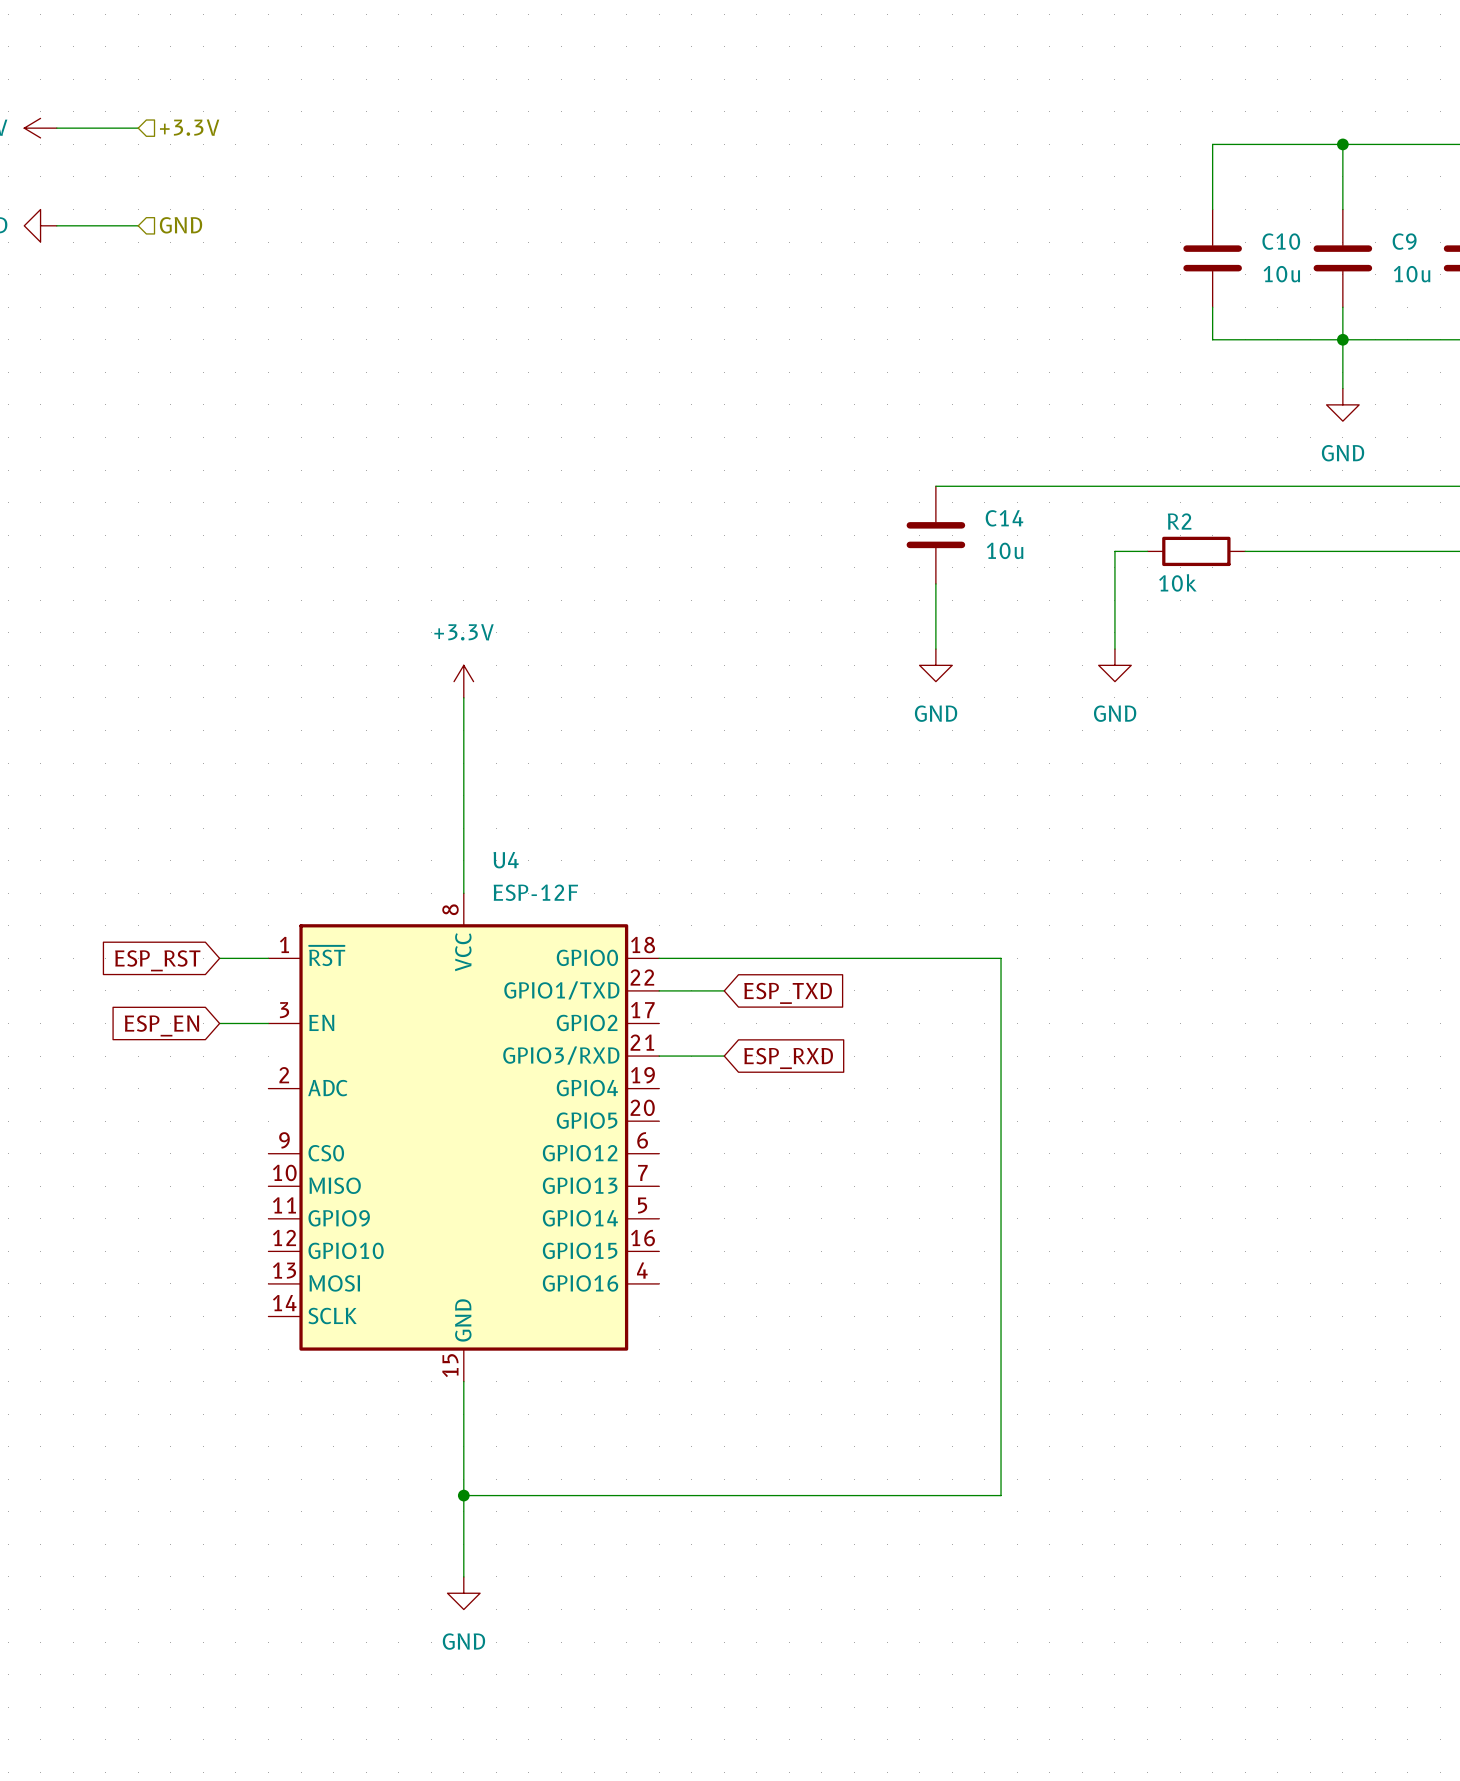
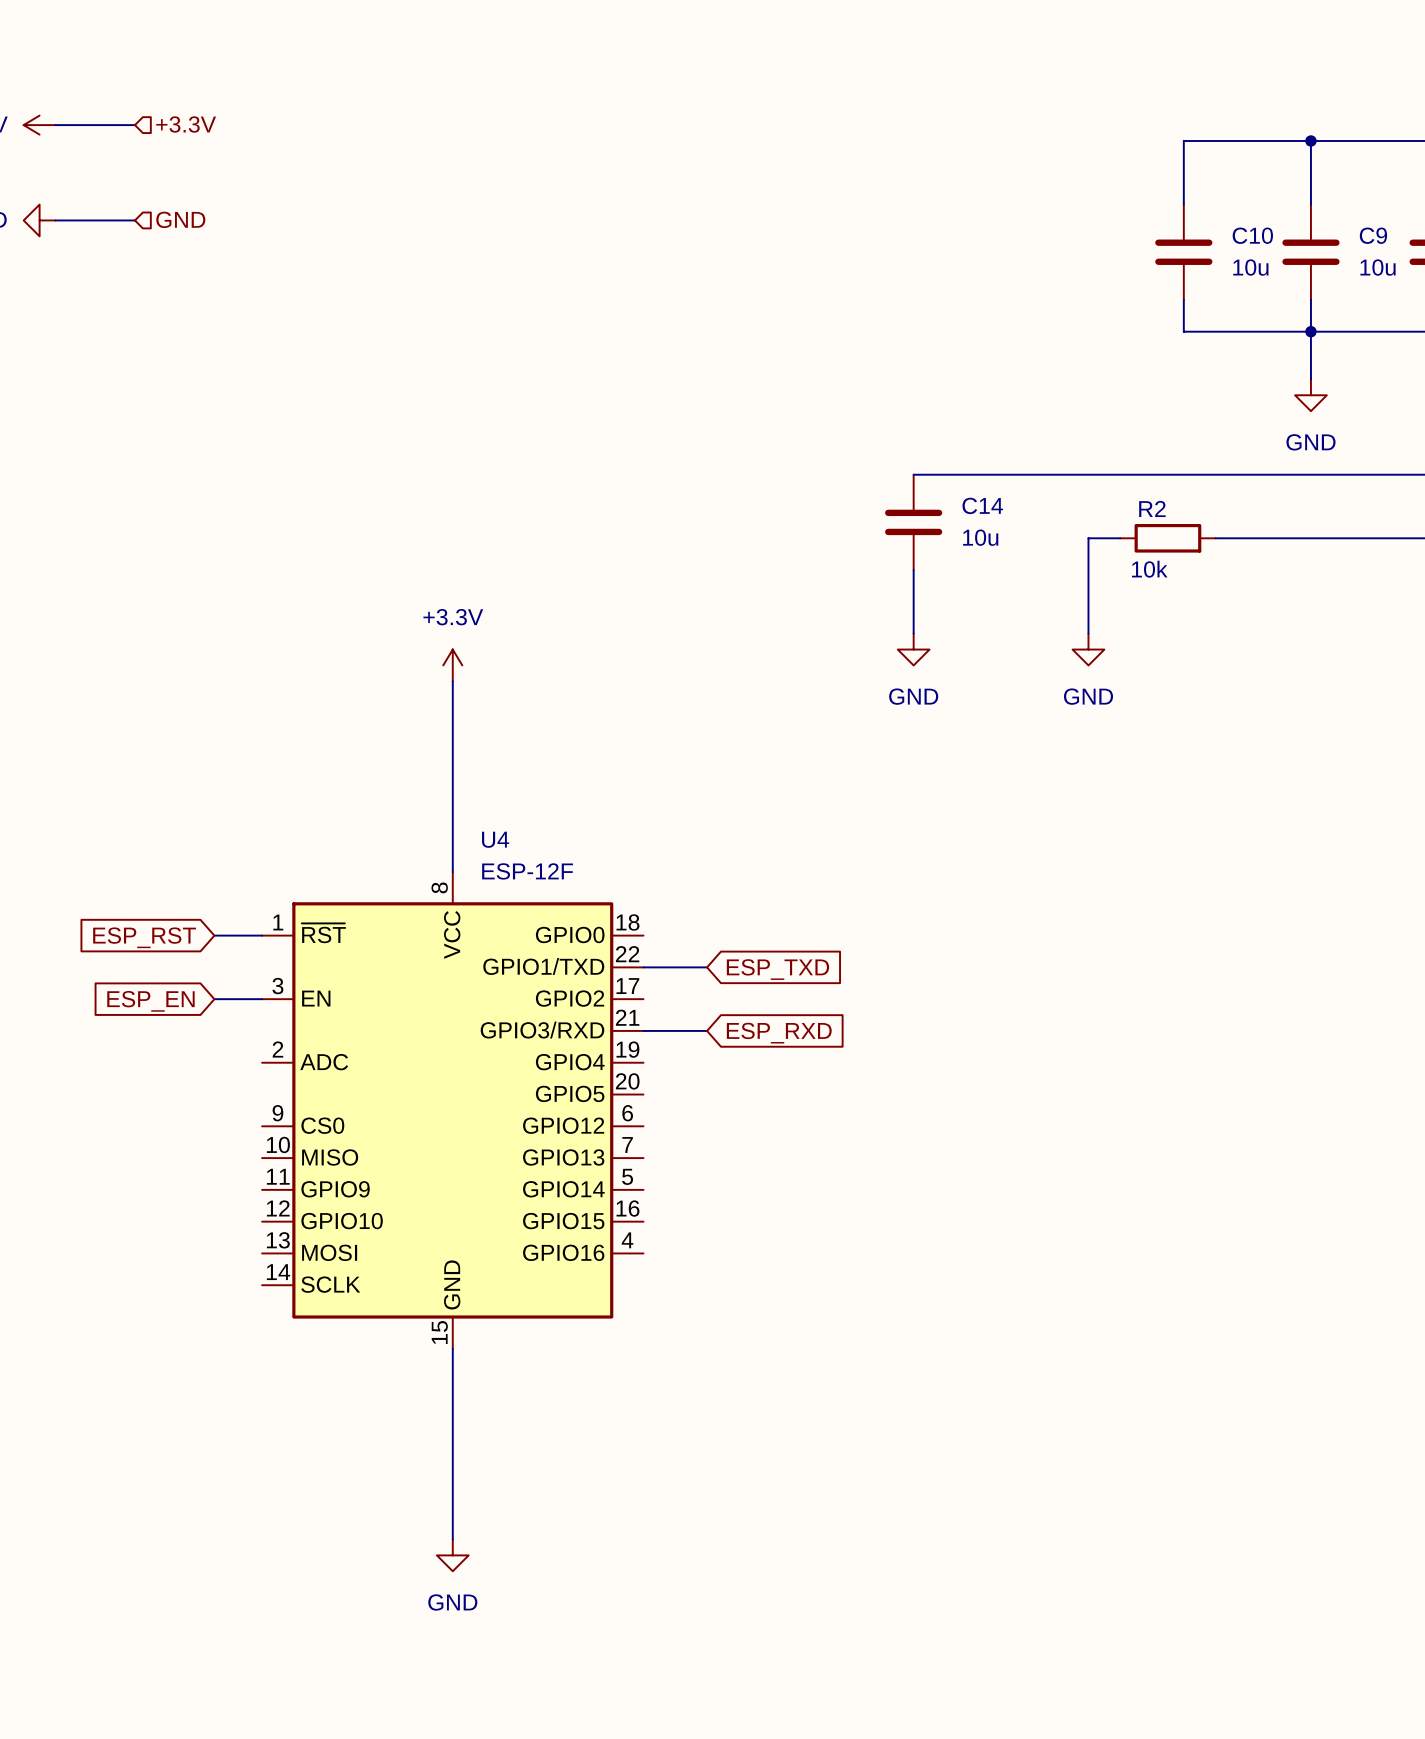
wire: (659, 958) (1001, 958) (1001, 1495) (463, 1495) -> none
junction: (463, 1495) -> none

